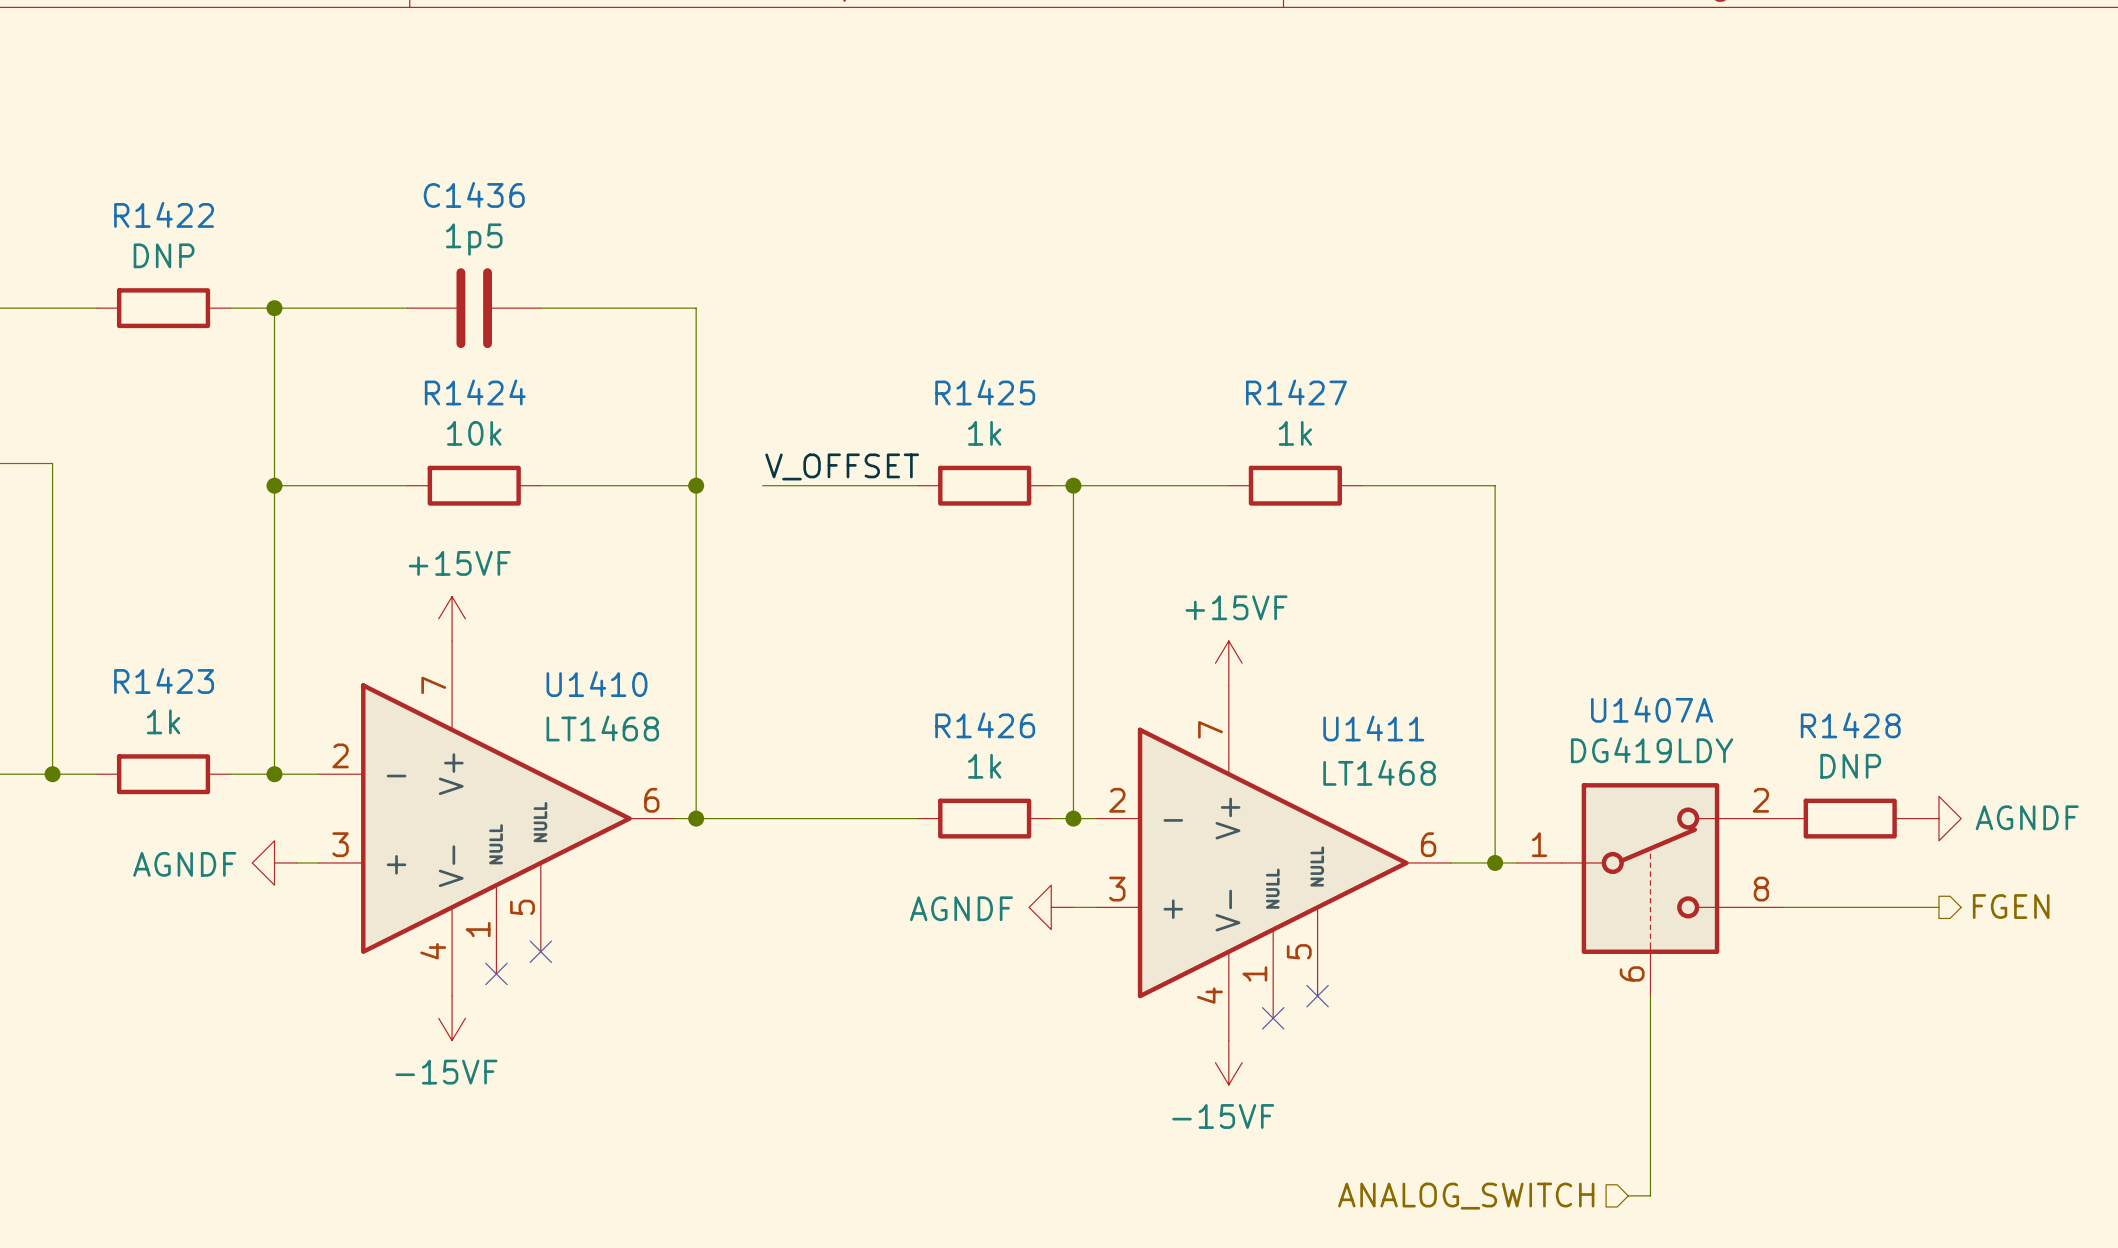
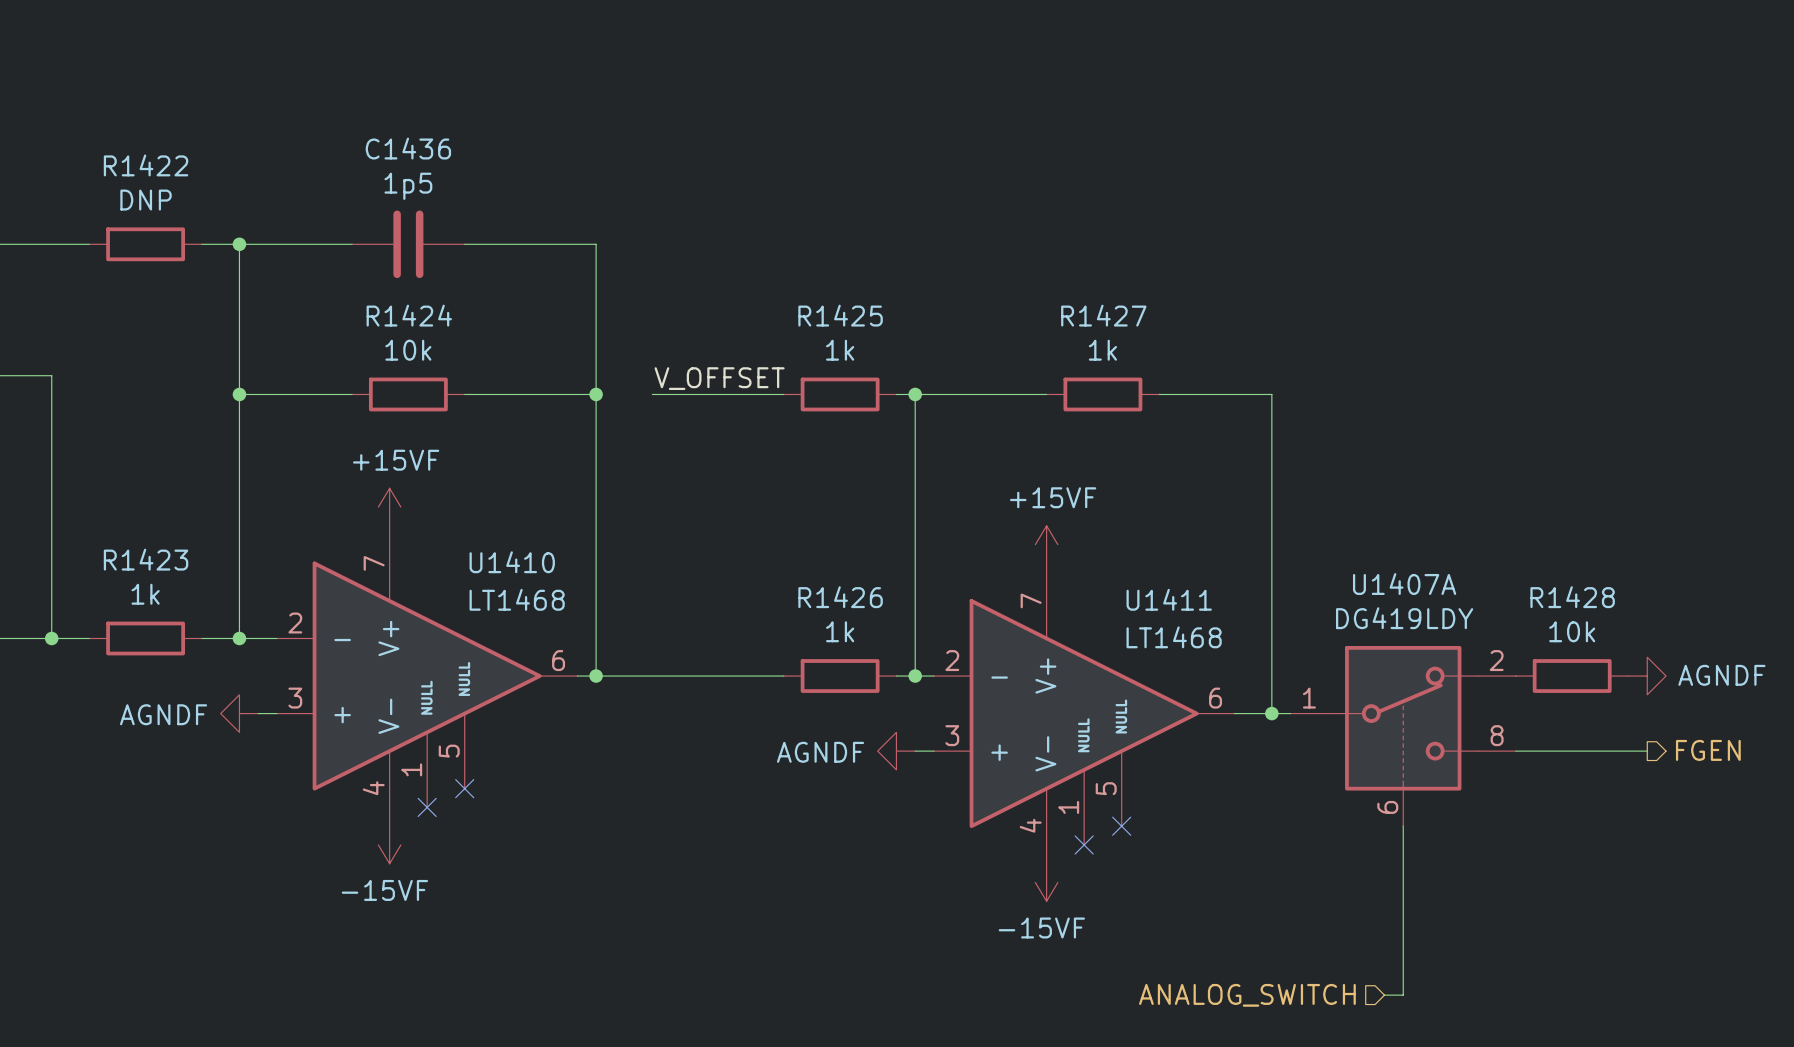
R1428 value: DNP (1850, 766) -> 10k (1572, 631)

